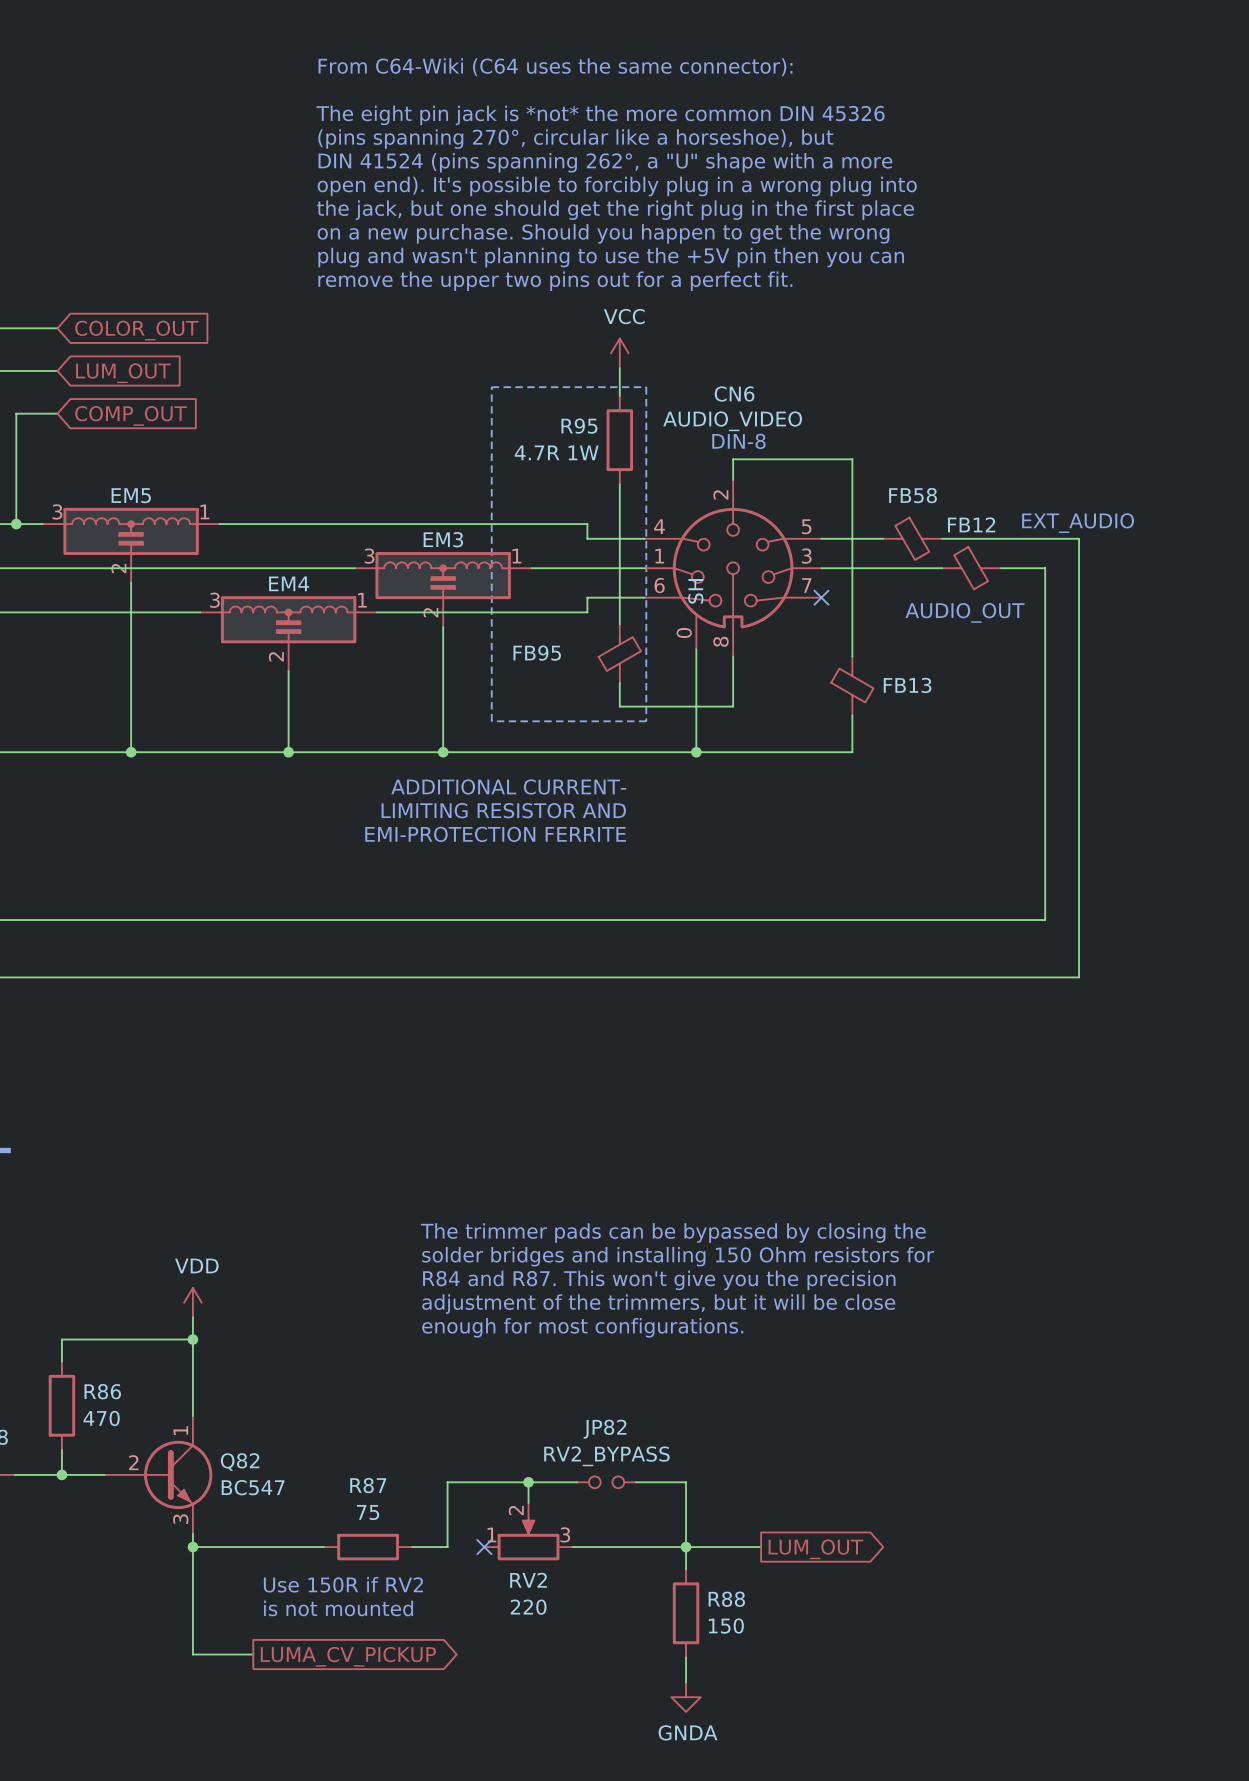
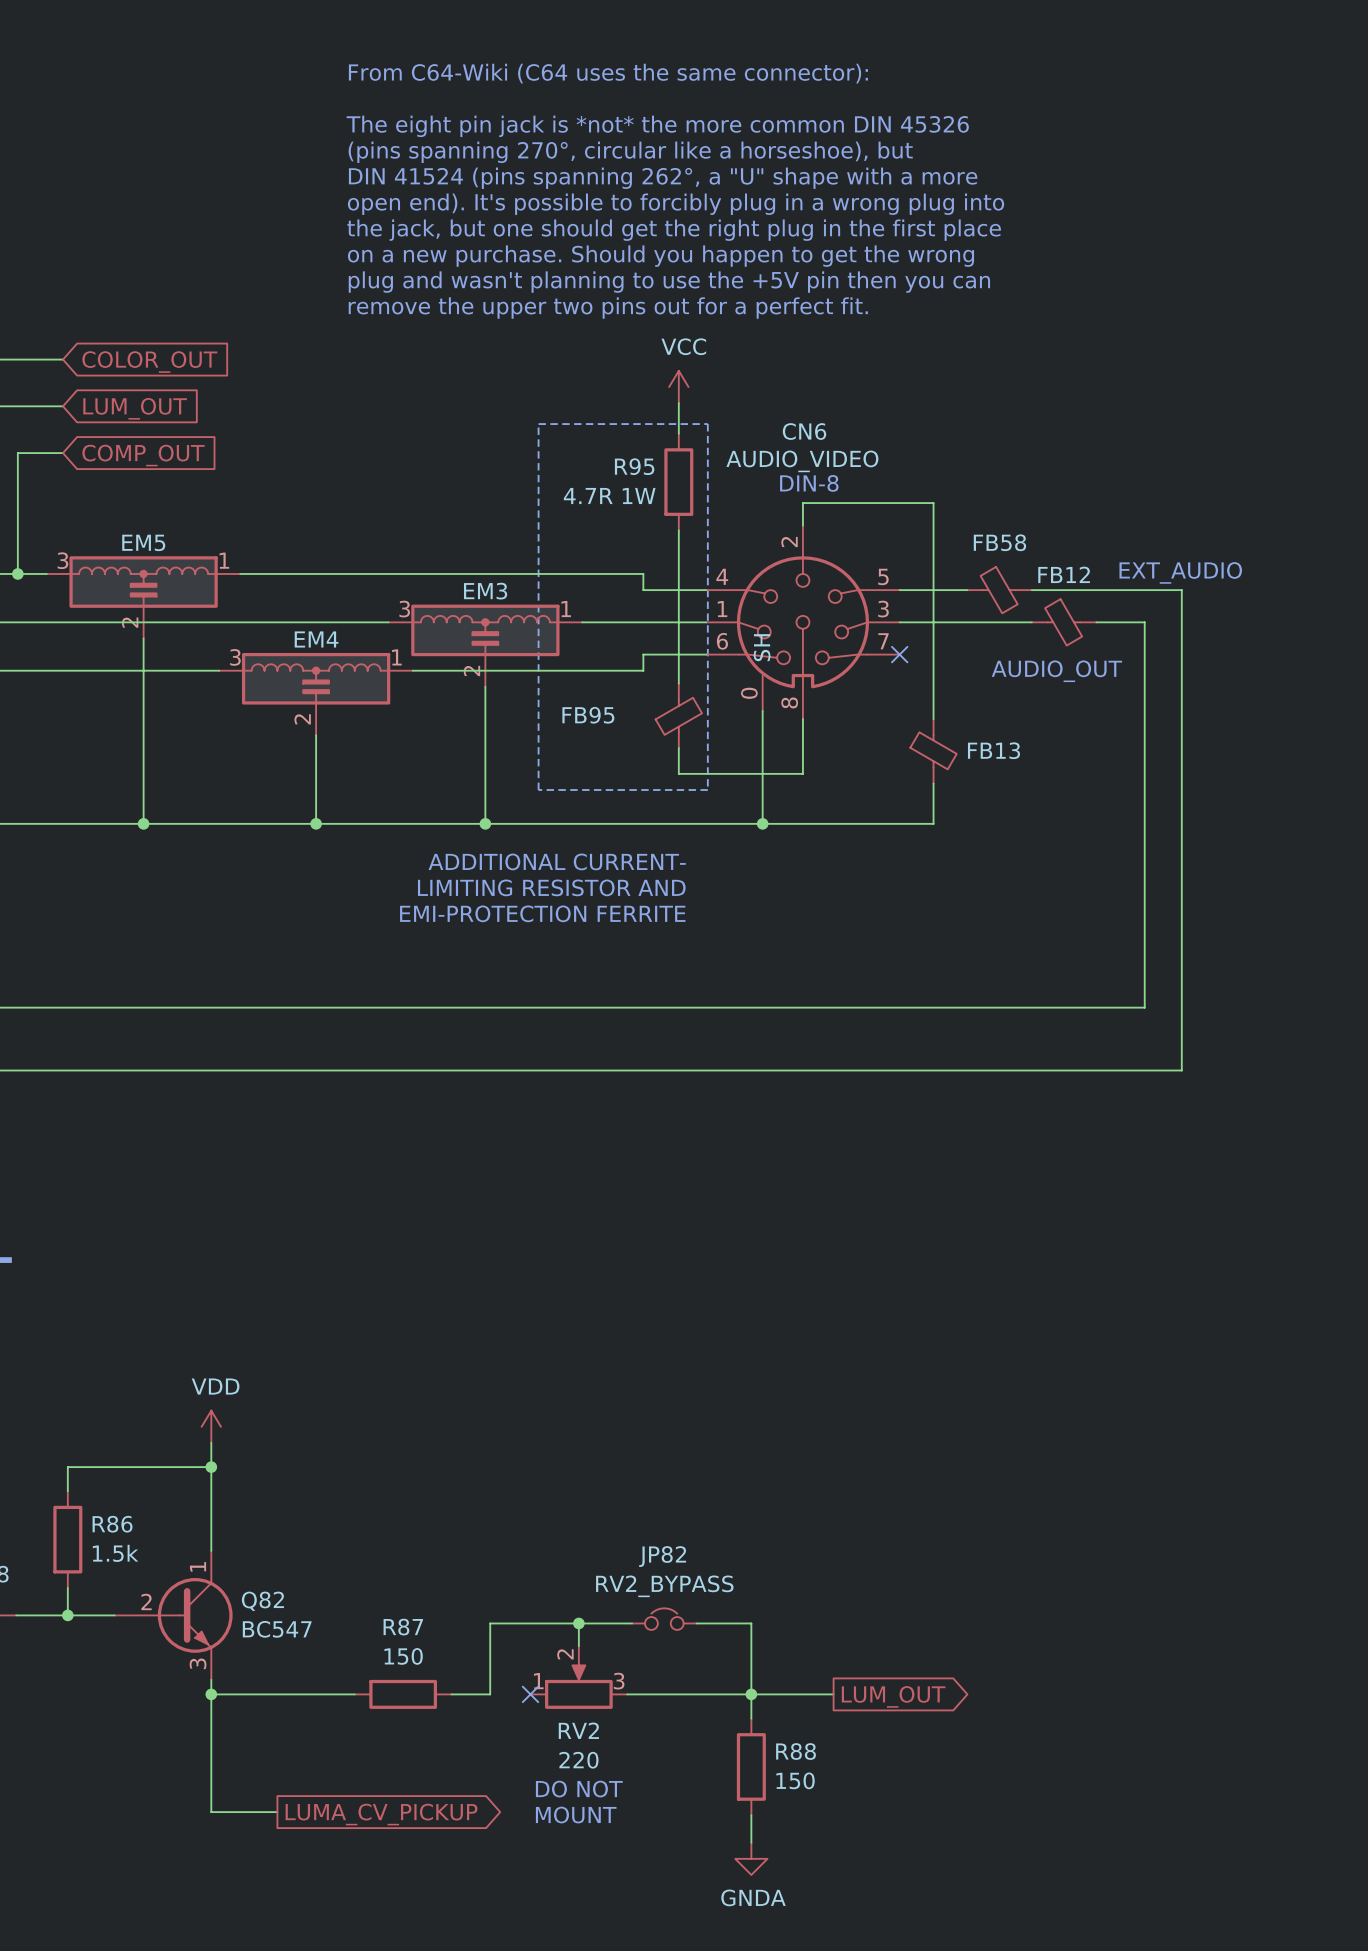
text: The trimmer pads can be bypassed by closing the (673, 1232) -> none
text: solder bridges and installing 150 Ohm resistors for (678, 1256) -> none
text: R84 and R87. This won't give you the precision (659, 1280) -> none
text: adjustment of the trimmers, but it will be close (658, 1304) -> none
text: enough for most configurations. (582, 1327) -> none
R86 value: 470 (101, 1418) -> 1.5k (115, 1553)
JP82 symbol: [577, 1476, 636, 1489] -> [632, 1608, 697, 1630]
R87 value: 75 (368, 1512) -> 150 (403, 1656)
text: Use 150R if RV2 (343, 1584) -> none
text: is not mounted (338, 1608) -> none
text: none -> DO NOT (579, 1789)
text: none -> MOUNT (576, 1815)

